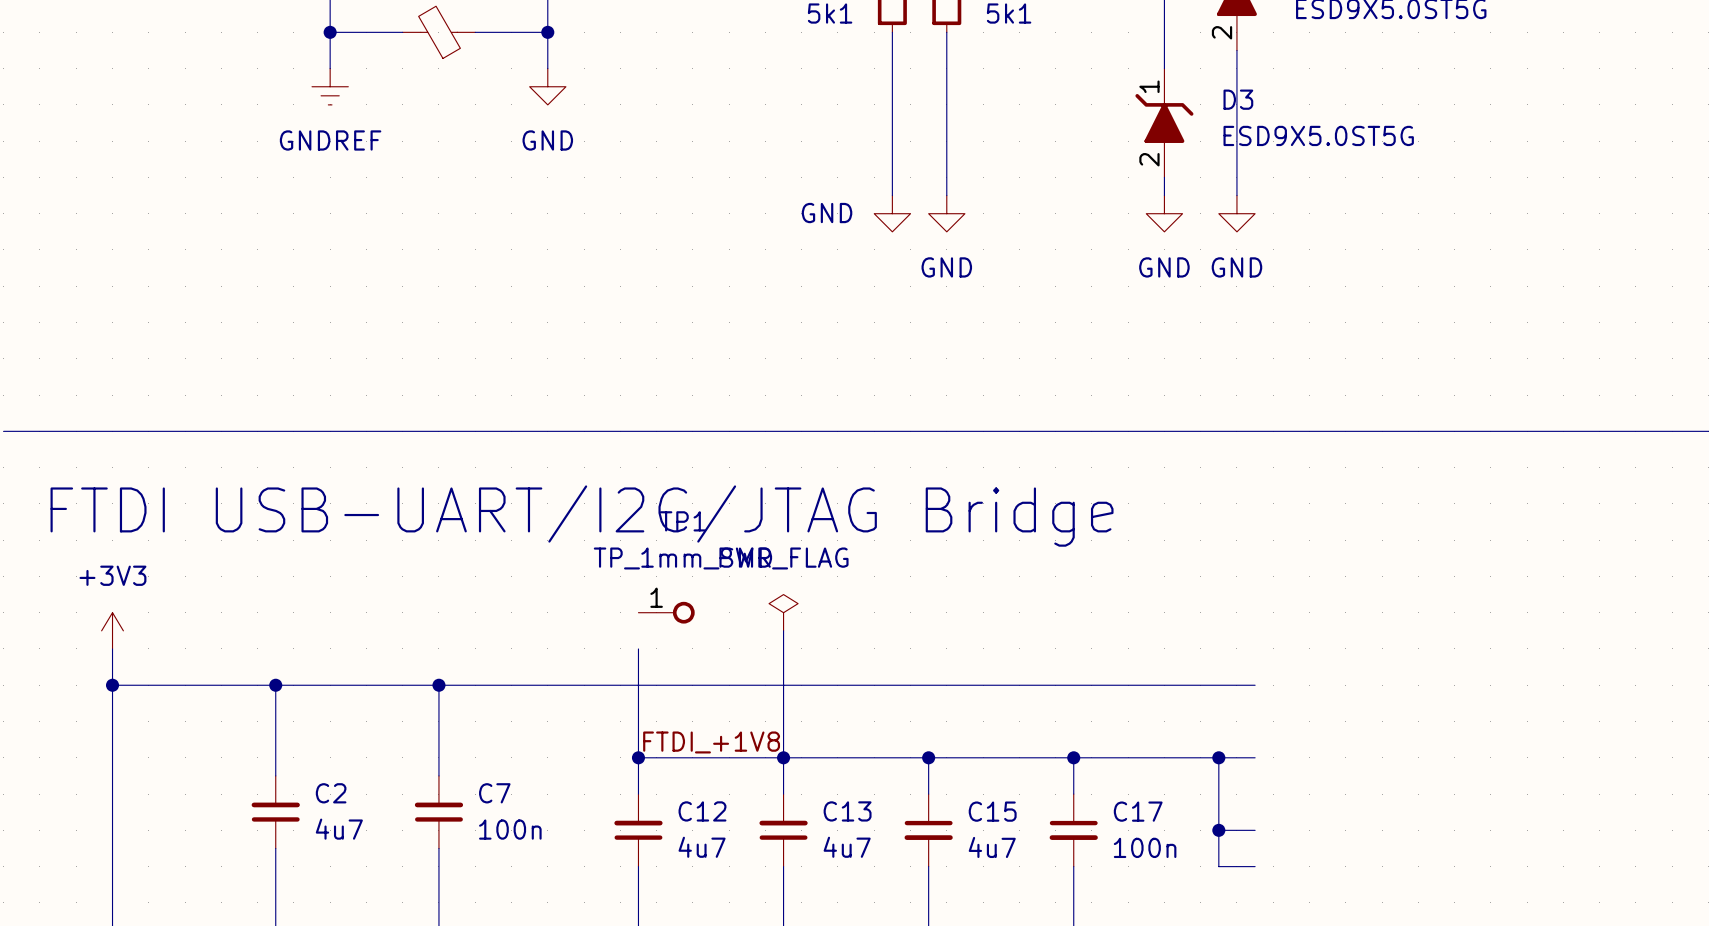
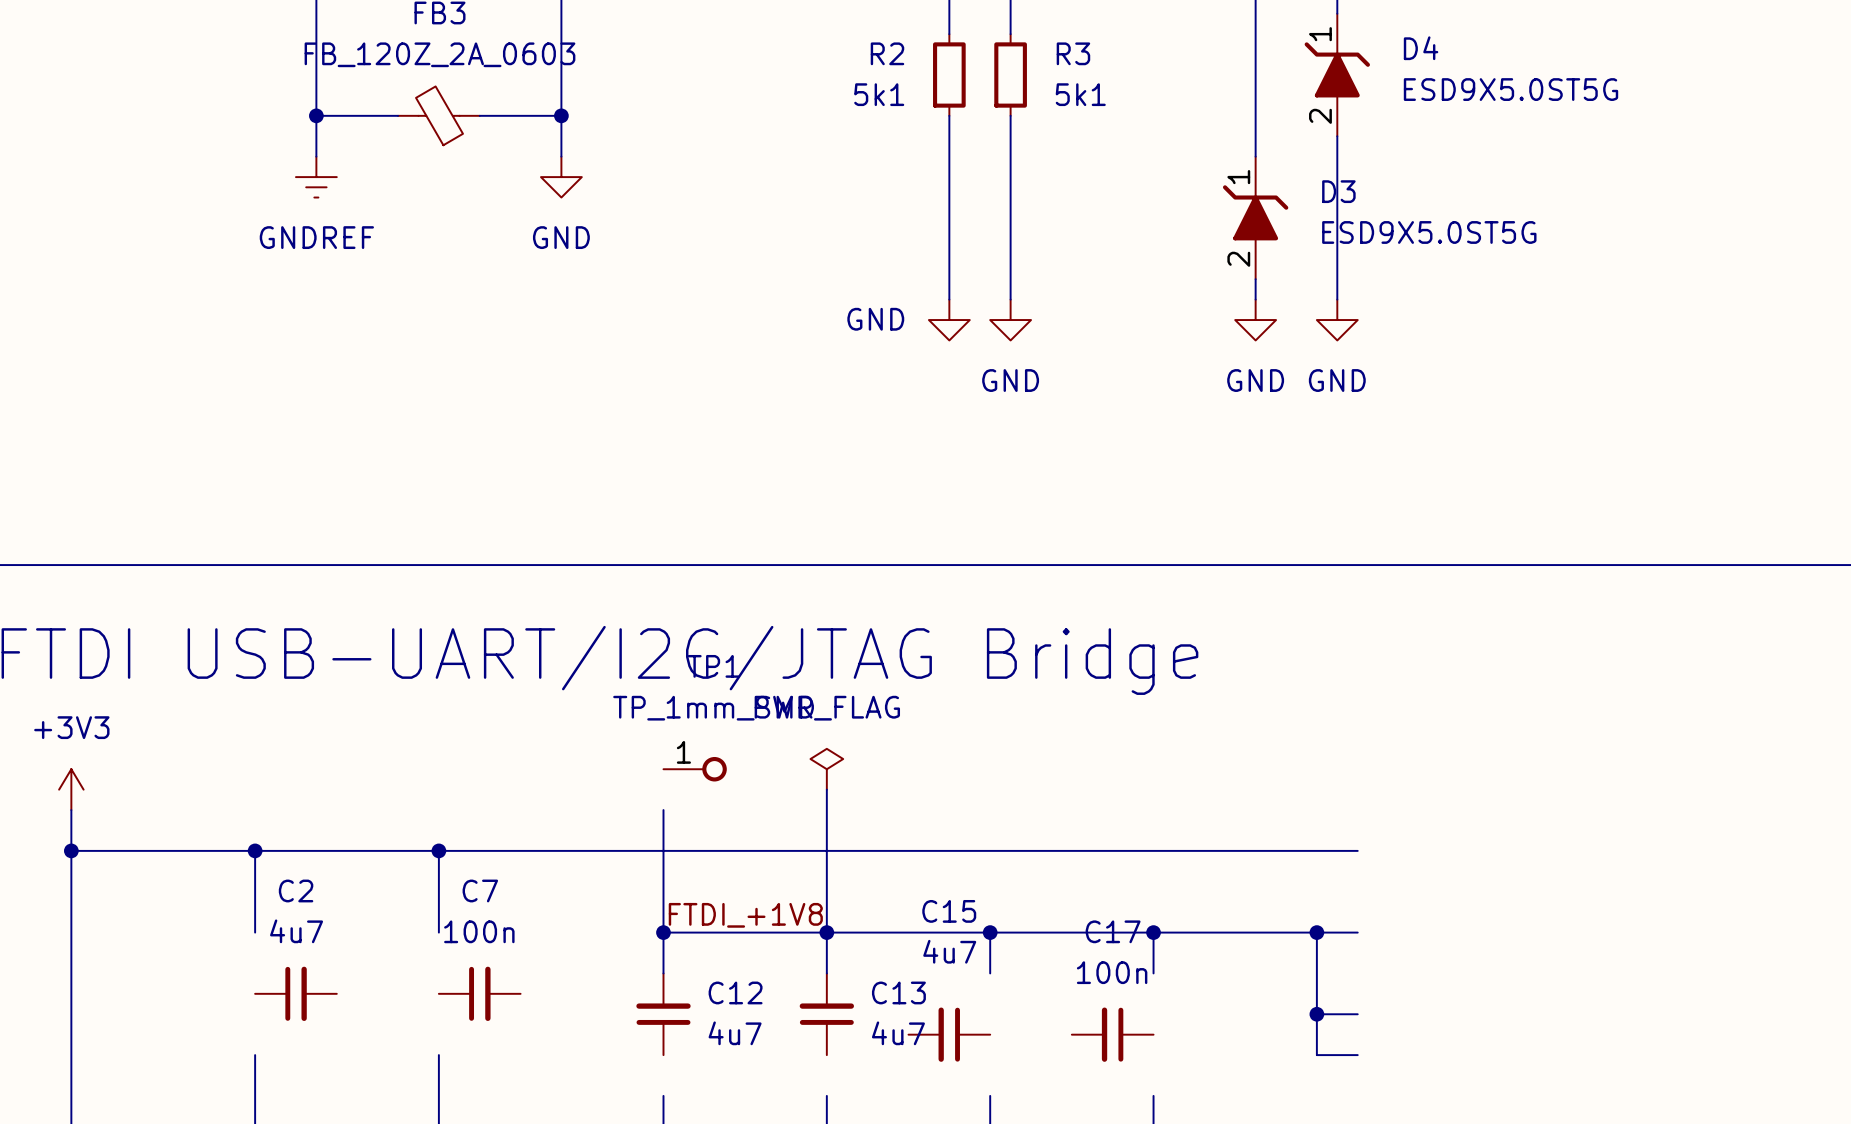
wire: (275, 757) (275, 775) -> none
wire: (438, 757) (438, 775) -> none
C2 name position: C2 (331, 793) -> C2 (296, 890)
C7 name position: C7 (494, 793) -> C7 (480, 890)
C15 name position: C15 (992, 811) -> C15 (949, 911)
C17 name position: C17 (1138, 811) -> C17 (1113, 931)
C2 rotation: 0° (275, 812) -> 90° clockwise (296, 993)
C7 rotation: 0° (438, 812) -> 90° clockwise (479, 993)
C2 text position: 4u7 (339, 829) -> 4u7 (296, 931)
C7 text position: 100n (510, 829) -> 100n (479, 931)
C15 rotation: 0° (928, 830) -> 90° clockwise (949, 1034)
C17 rotation: 0° (1073, 830) -> 90° clockwise (1112, 1034)
C15 text position: 4u7 (992, 847) -> 4u7 (949, 951)
C17 text position: 100n (1145, 847) -> 100n (1112, 972)
wire: (275, 848) (275, 866) -> none
wire: (438, 848) (438, 866) -> none
wire: (638, 866) (638, 902) -> none
wire: (783, 866) (783, 902) -> none
wire: (928, 866) (928, 902) -> none
wire: (1073, 866) (1073, 902) -> none

